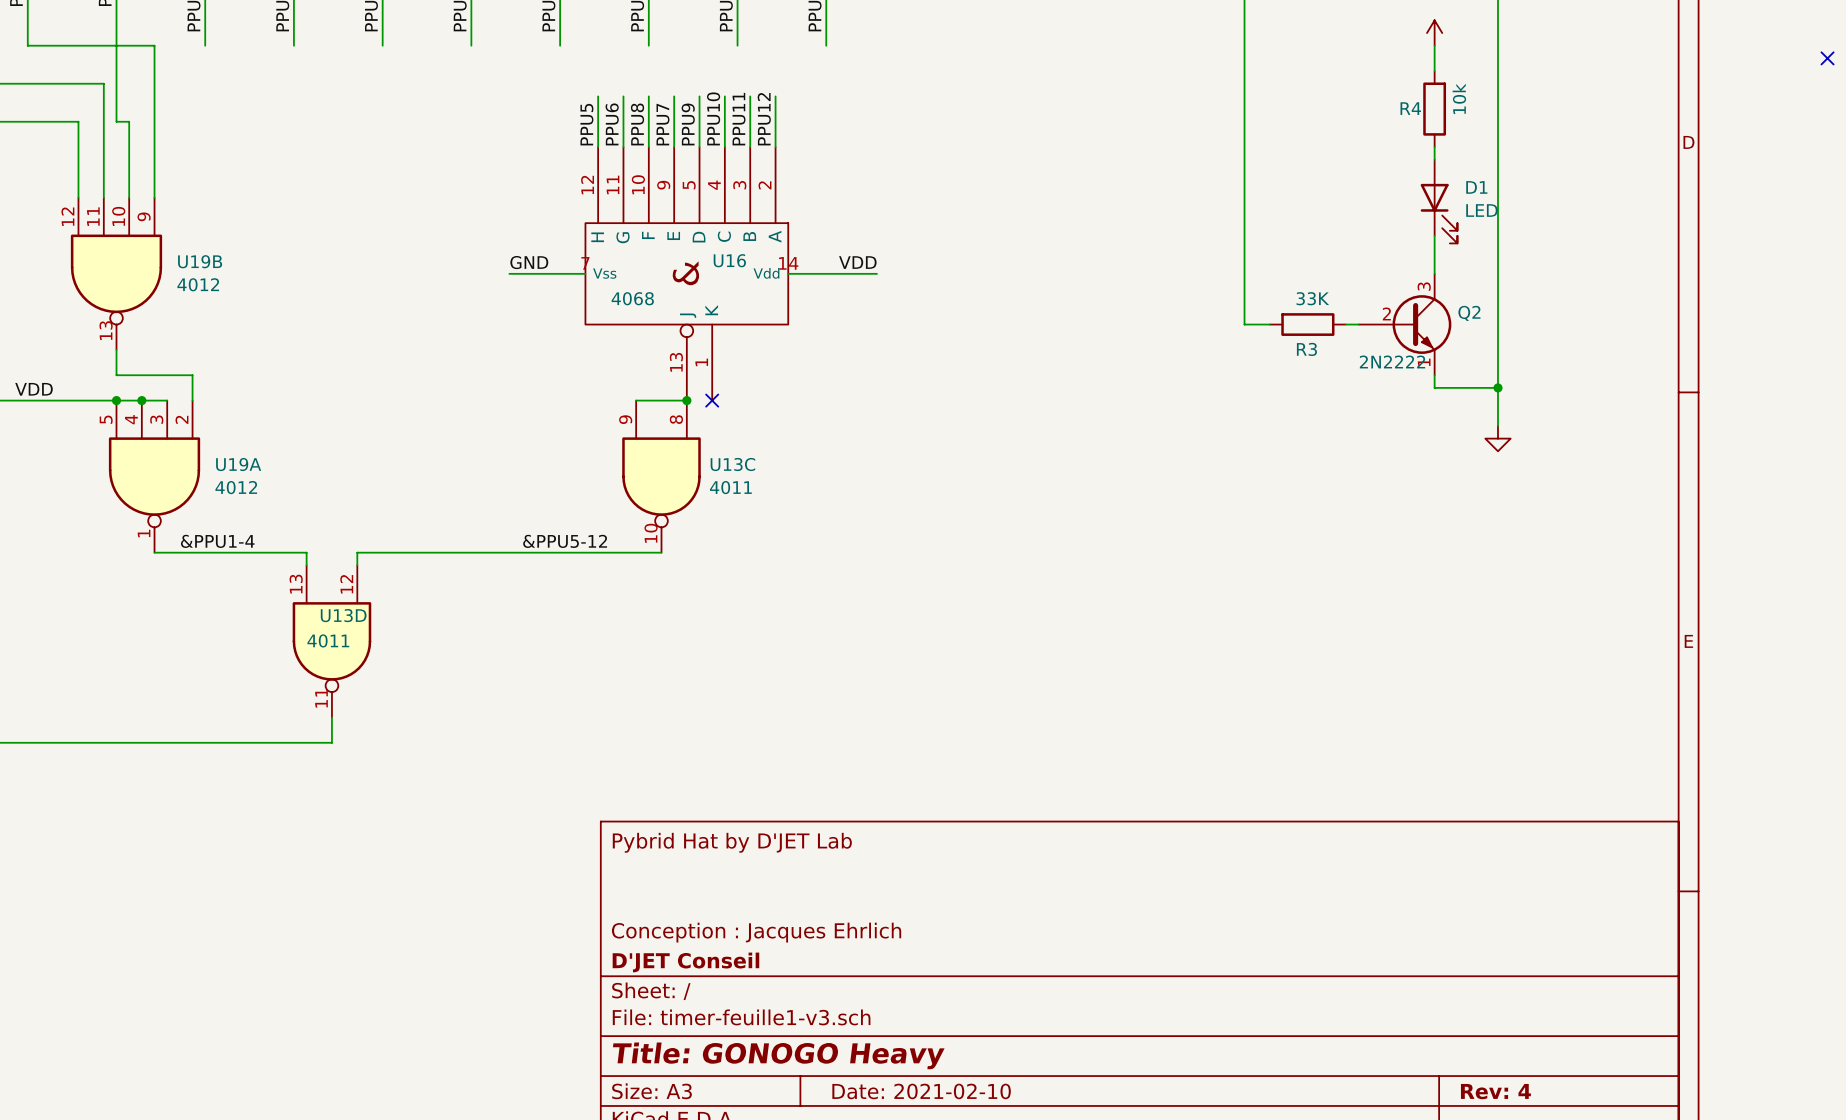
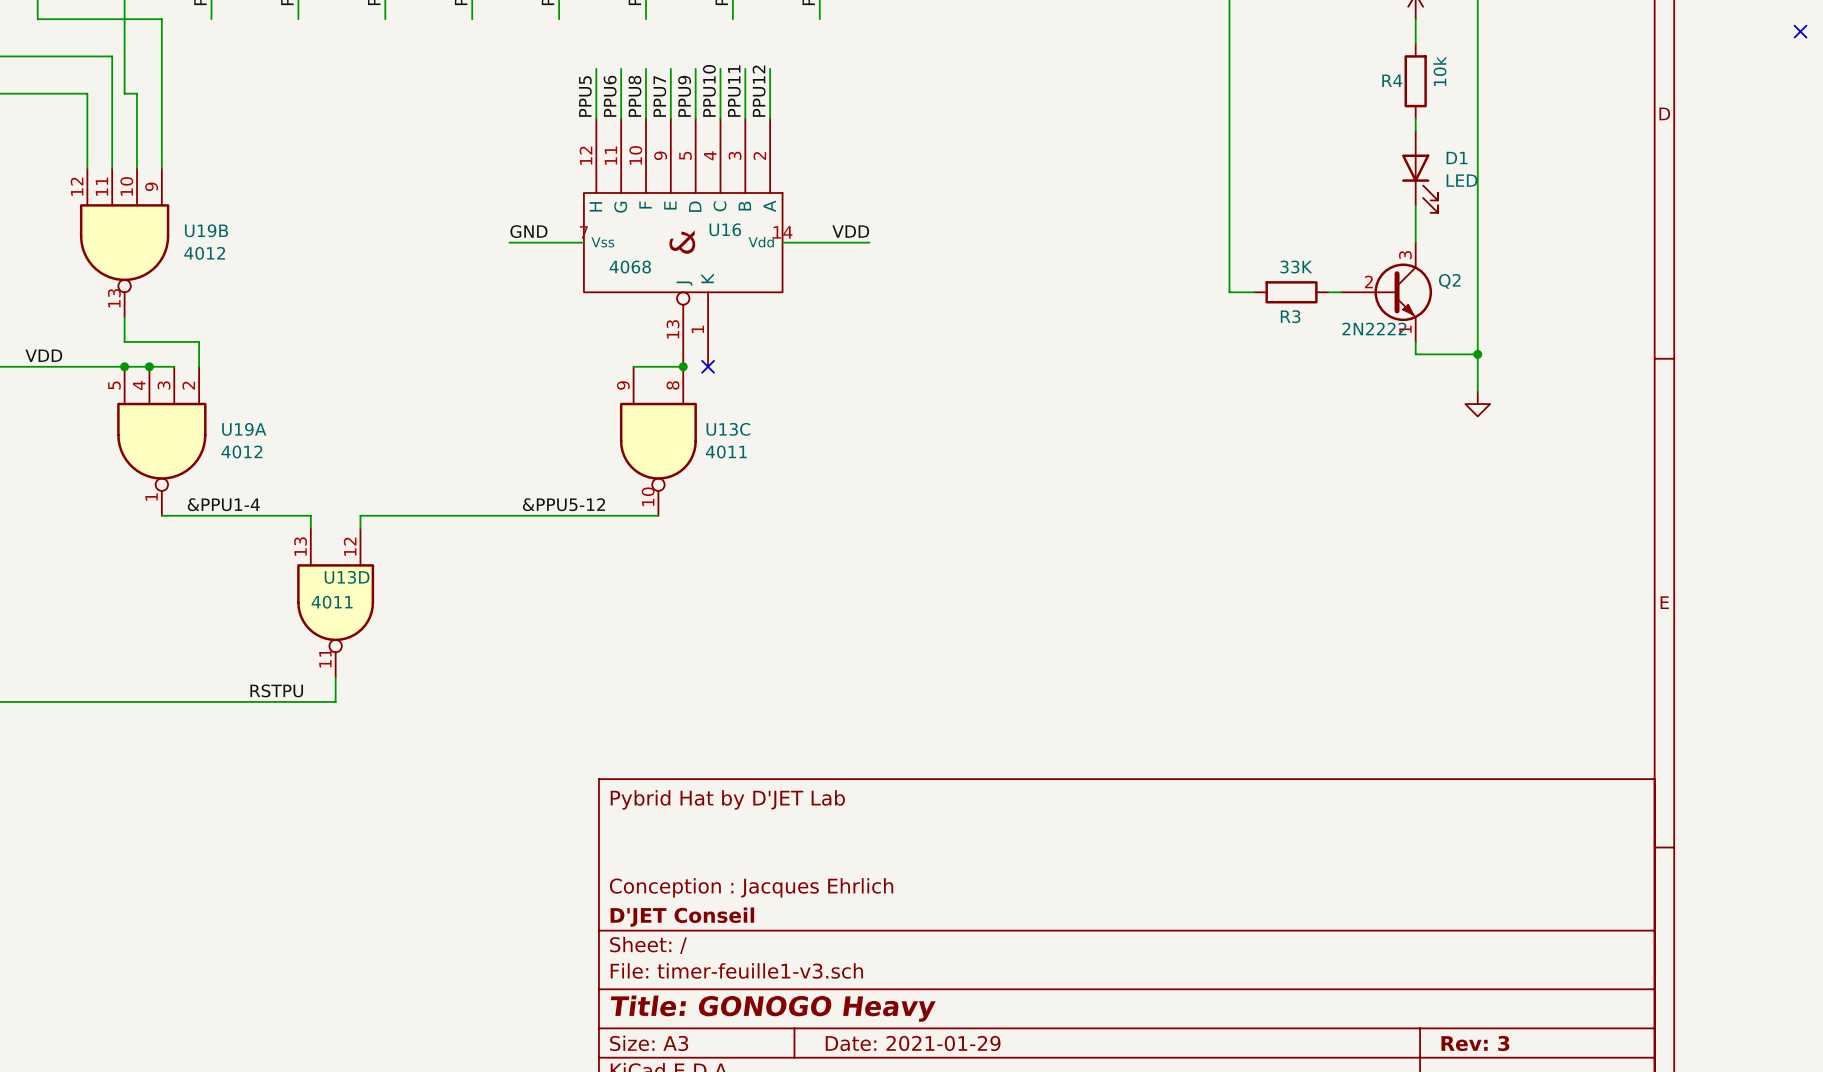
label: none -> RSTPU (276, 690)
title block: Date: 2021-02-10 (921, 1091) -> Date: 2021-01-29 (913, 1043)
title block: Rev: 4 (1495, 1091) -> Rev: 3 (1475, 1043)

